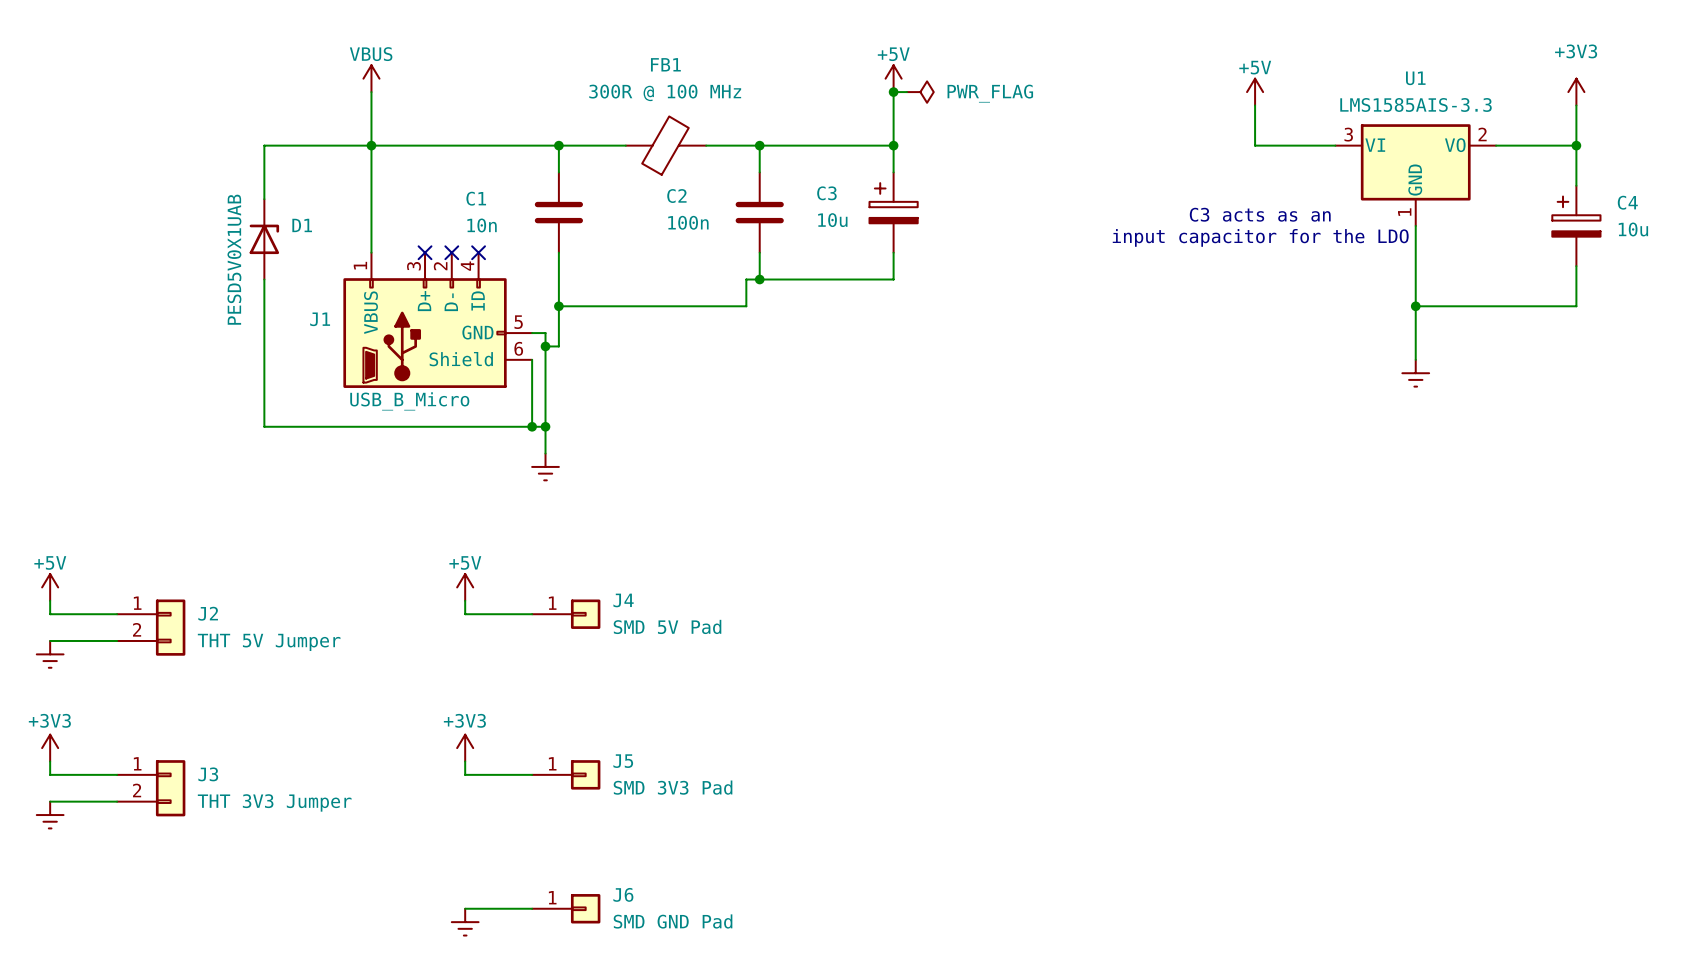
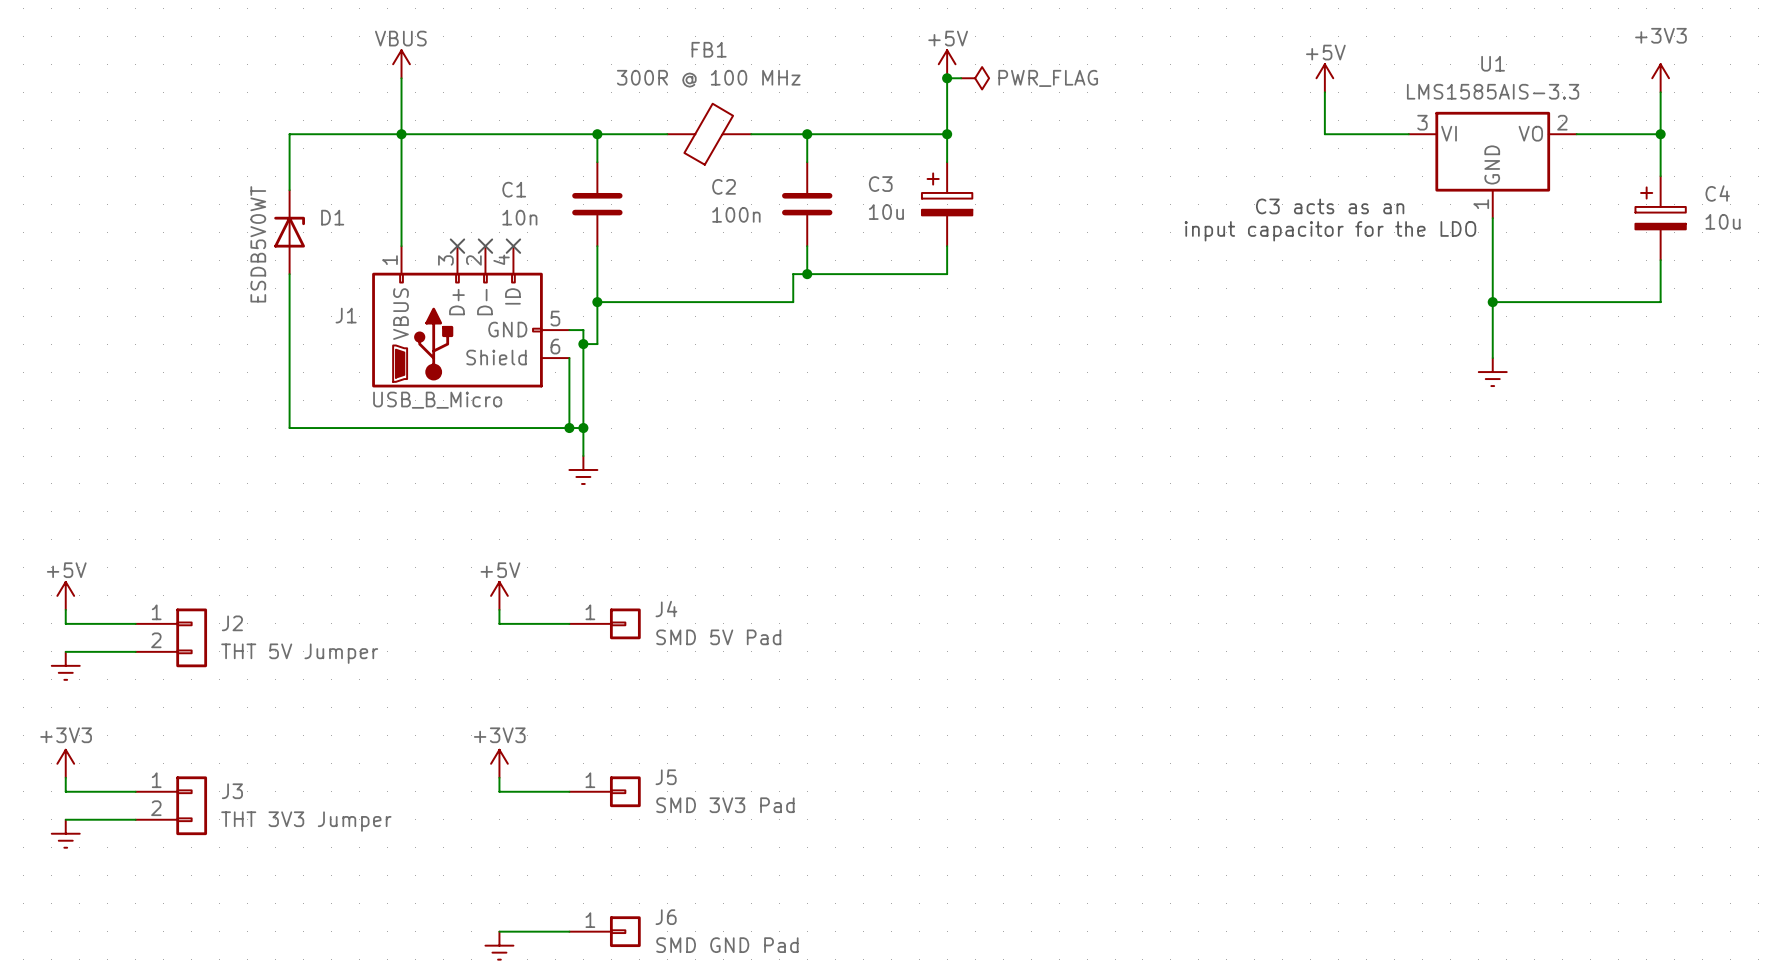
D1 value: PESD5V0X1UAB (234, 259) -> ESDB5V0WT (258, 244)

